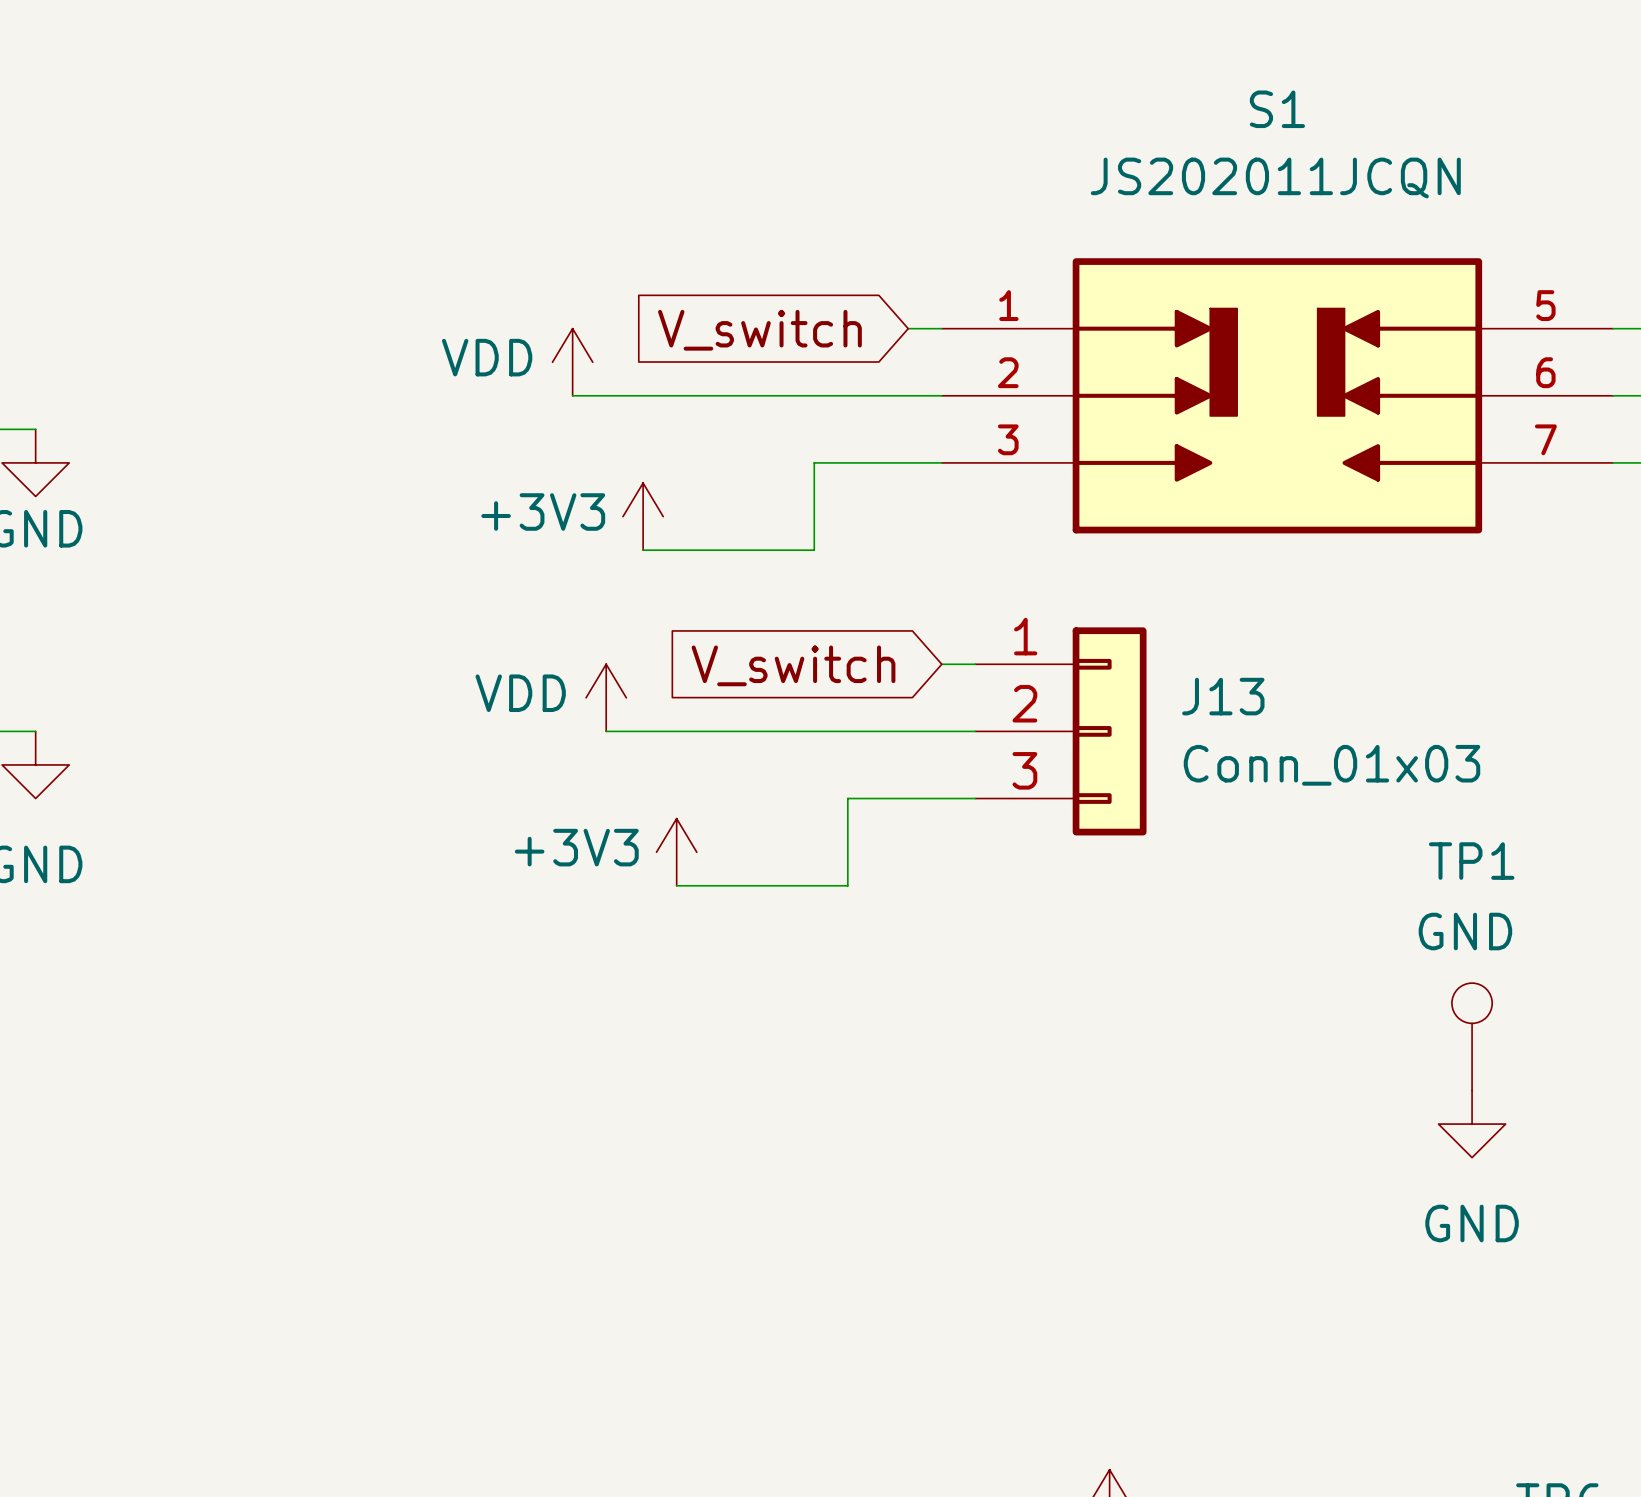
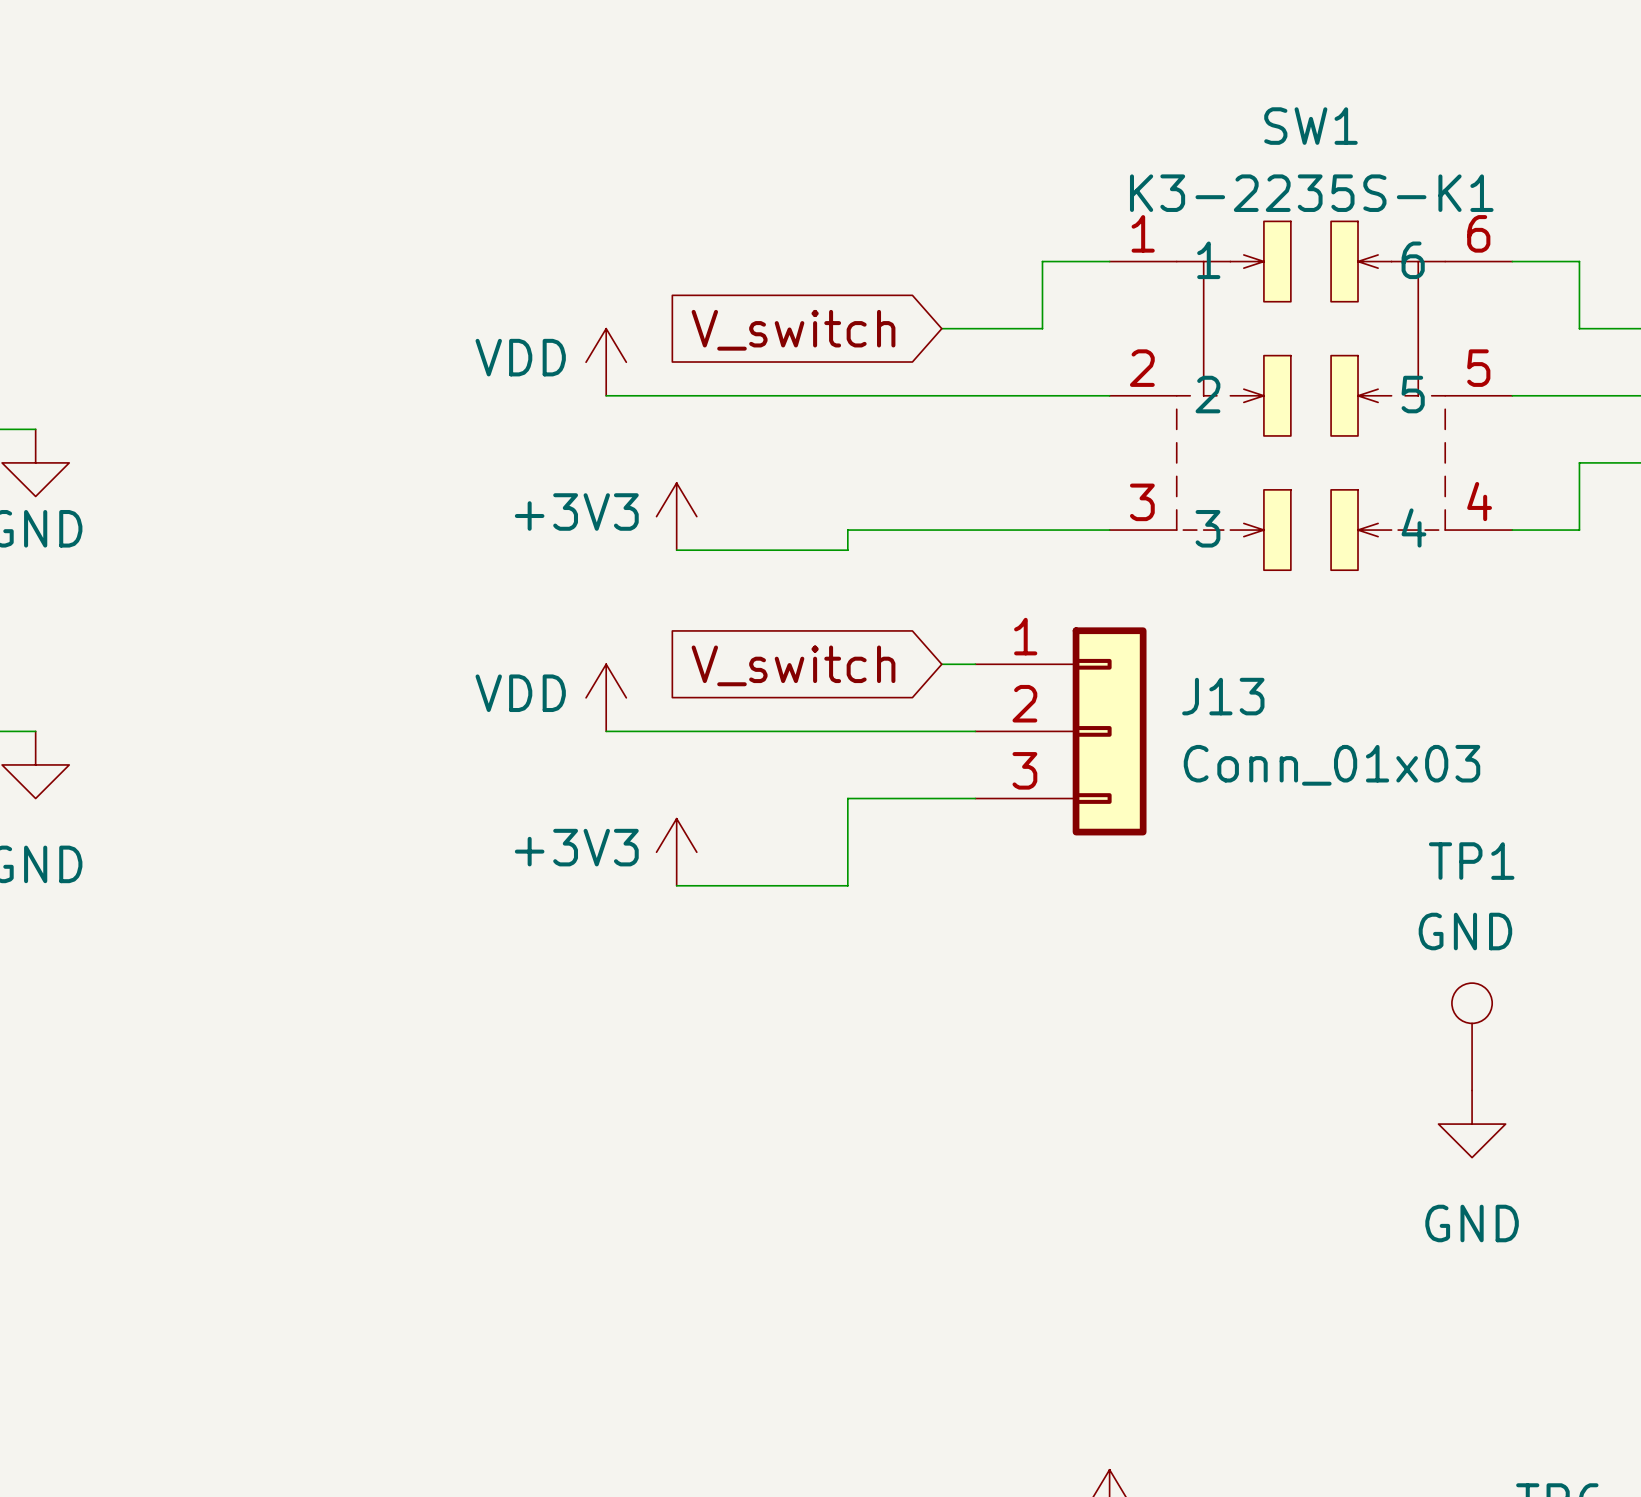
wire: none -> (1512, 261) (1579, 261) (1579, 328) (1613, 328)
wire: (908, 328) (941, 328) -> (1109, 261) (1042, 261) (1042, 328) (941, 328)
global label position: V_switch (759, 330) -> V_switch (793, 330)
power symbol position: VDD (572, 362) -> VDD (606, 362)
wire: (572, 395) (606, 395) -> none
S1: JS202011JCQN (1277, 395) -> none
SW1: none -> K3-2235S-K1 (1310, 395)
wire: (941, 462) (814, 462) (814, 550) -> (1109, 530) (847, 530) (847, 550) (814, 550)
wire: none -> (1613, 462) (1579, 462) (1579, 530) (1512, 530)
power symbol position: +3V3 (643, 516) -> +3V3 (676, 516)
wire: (643, 550) (676, 550) -> none

